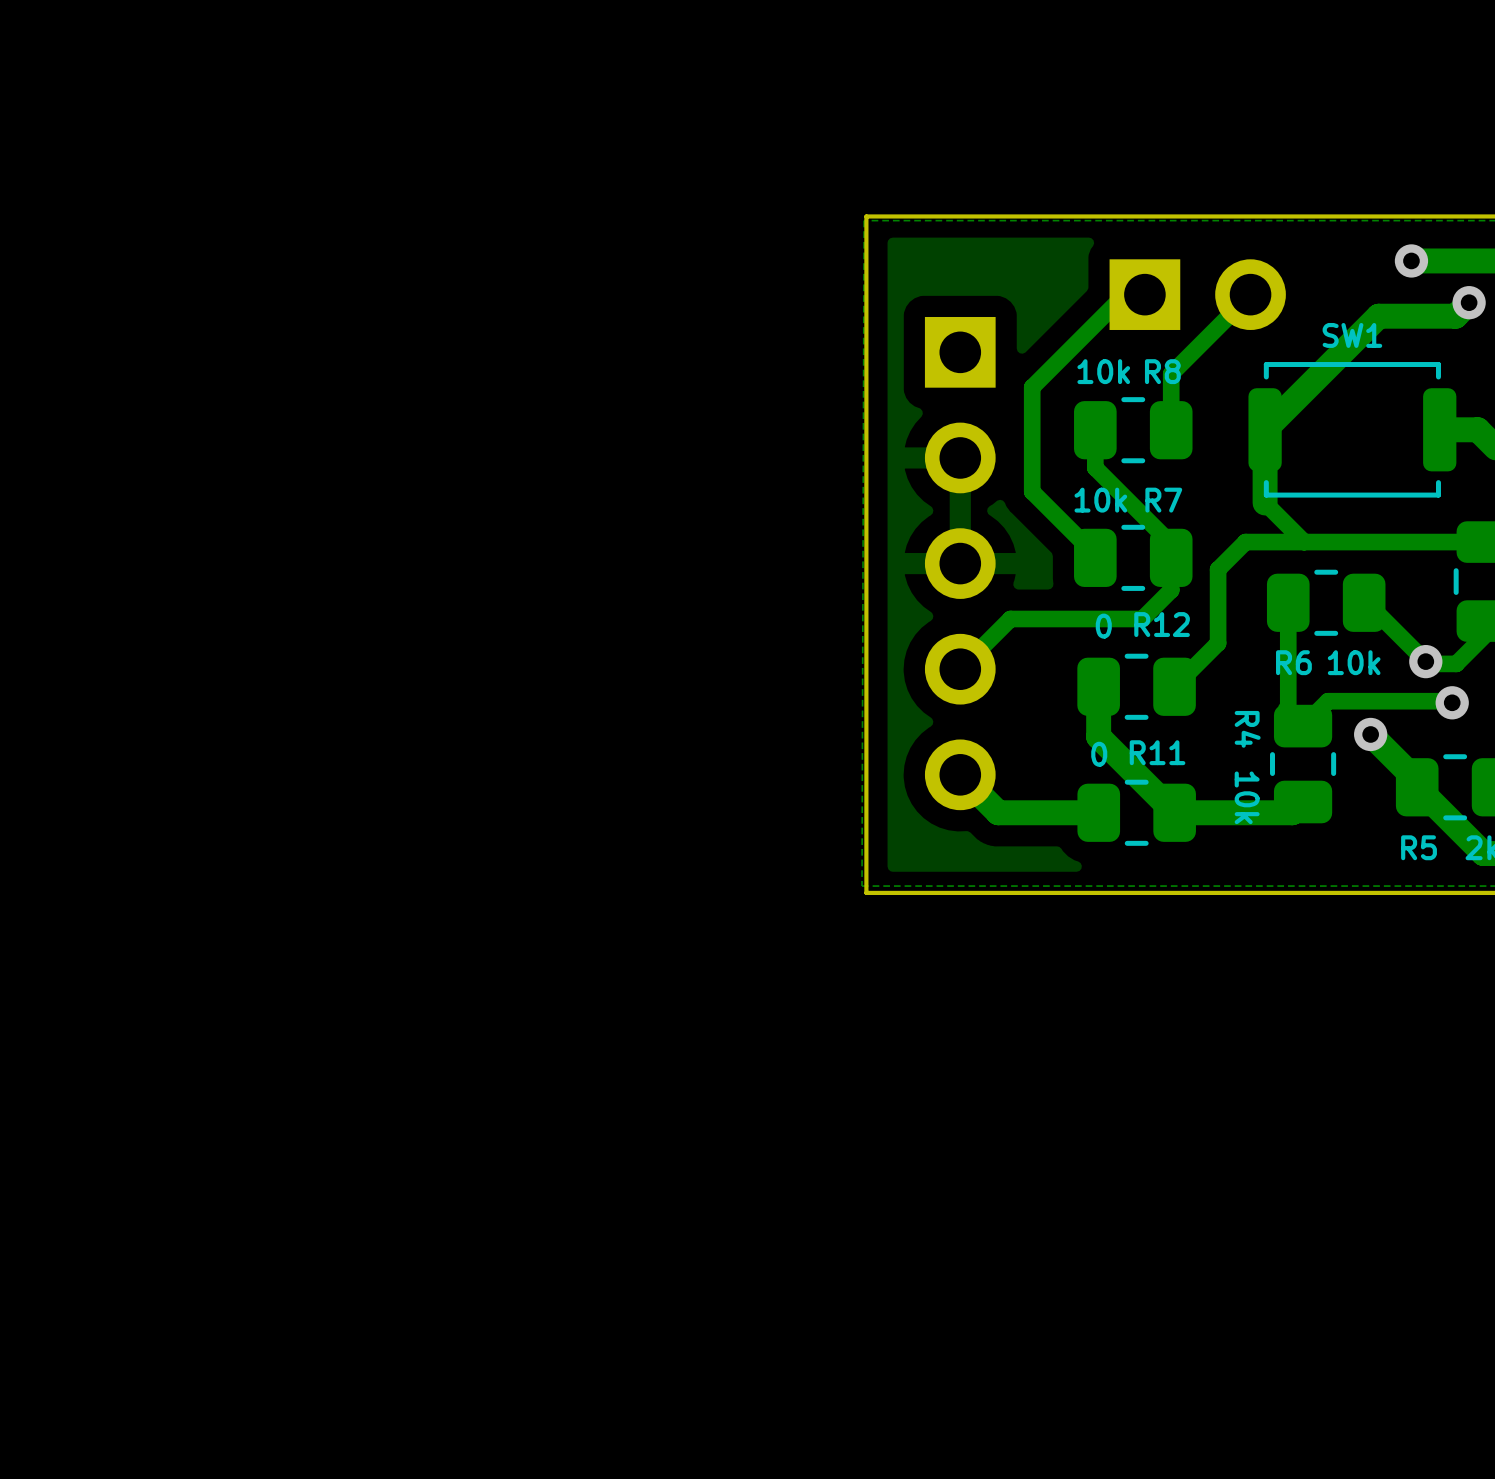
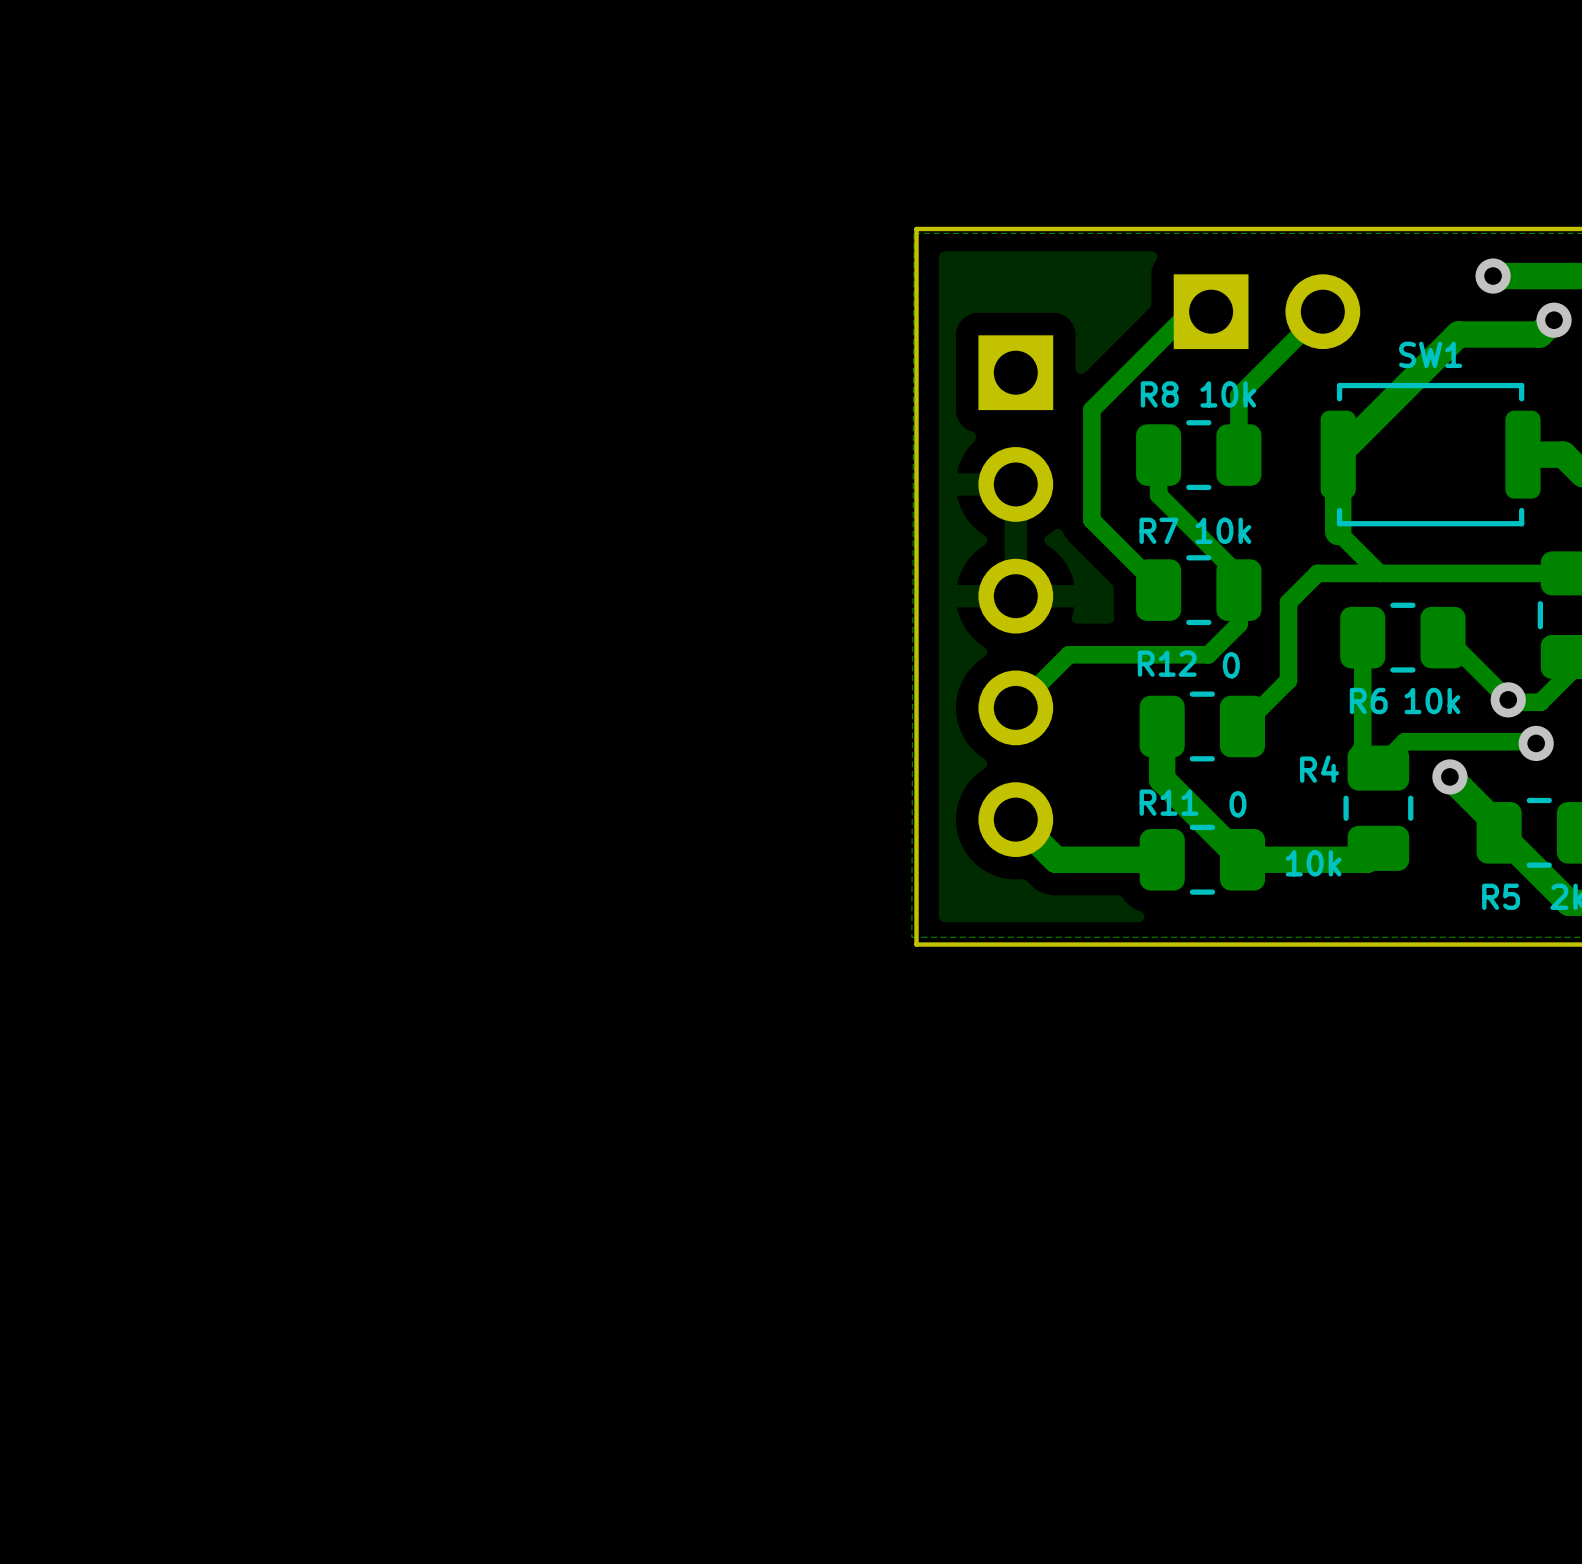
R8 text position: 10k (1103, 371) -> 10k (1228, 394)
R8 name position: R8 (1162, 371) -> R8 (1159, 394)
R7 text position: 10k (1100, 500) -> 10k (1223, 530)
R7 name position: R7 (1163, 500) -> R7 (1158, 530)
R12 name position: R12 (1162, 624) -> R12 (1167, 663)
R12 text position: 0 (1103, 626) -> 0 (1231, 665)
R4 name rotation: 0° (1247, 729) -> 90° counterclockwise (1319, 769)
R11 name position: R11 (1157, 752) -> R11 (1168, 802)
R11 text position: 0 (1099, 754) -> 0 (1237, 804)
R4 text rotation: 0° (1247, 797) -> 90° counterclockwise (1313, 863)

